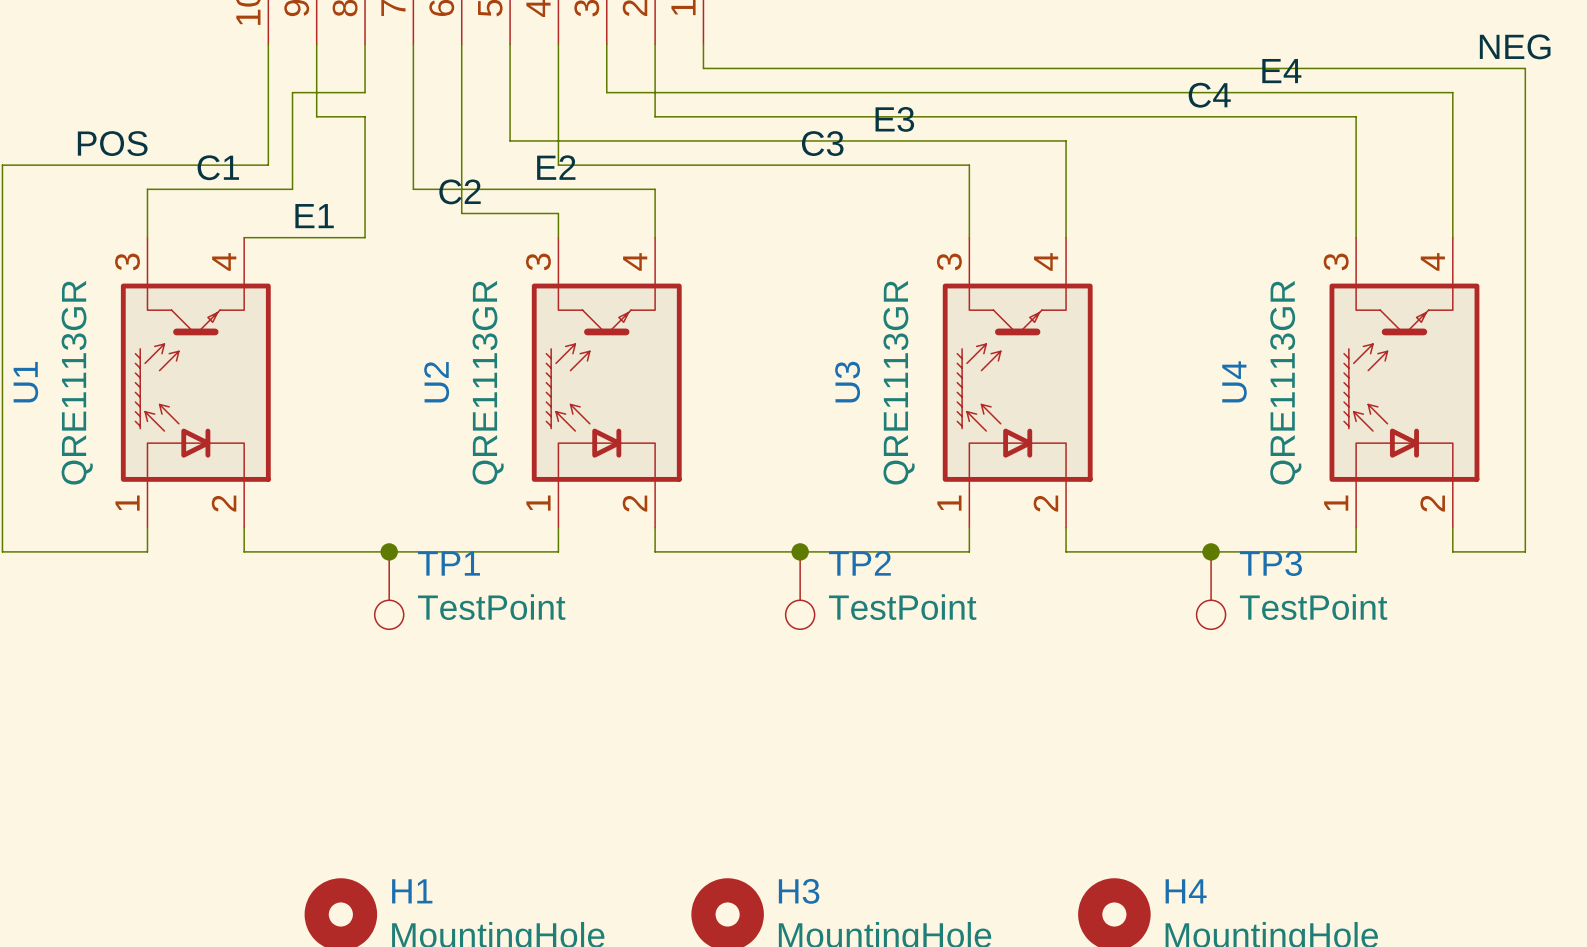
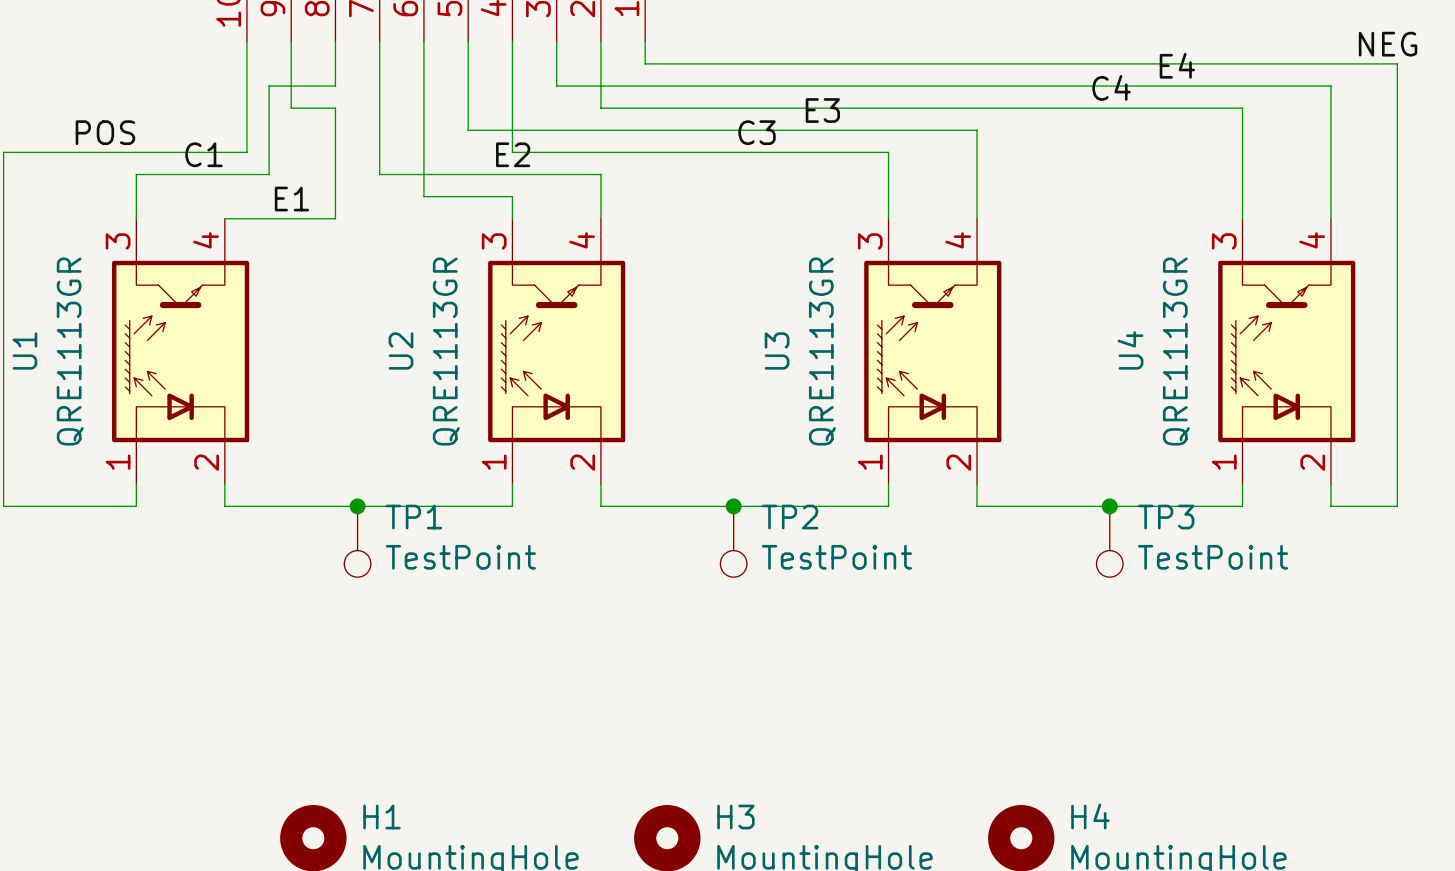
label: C2 (460, 191) -> none

